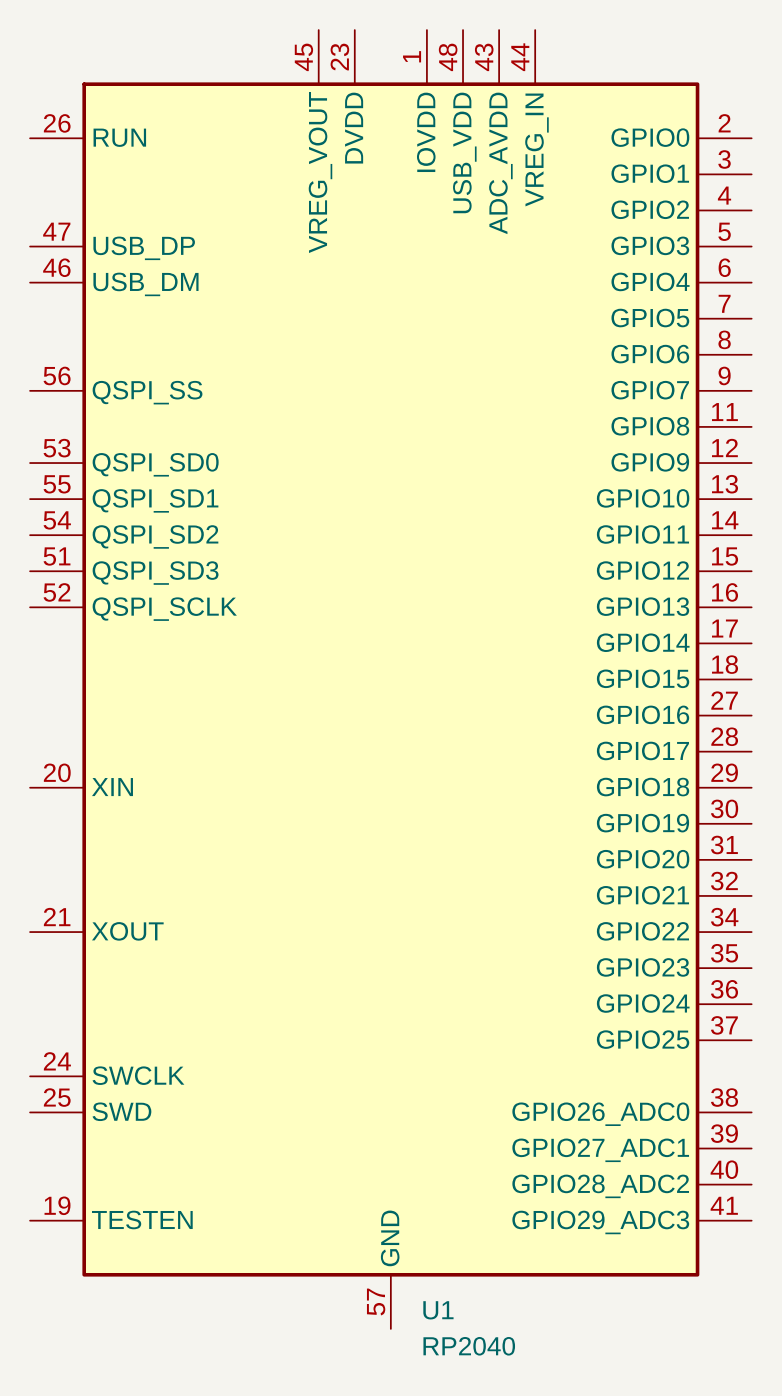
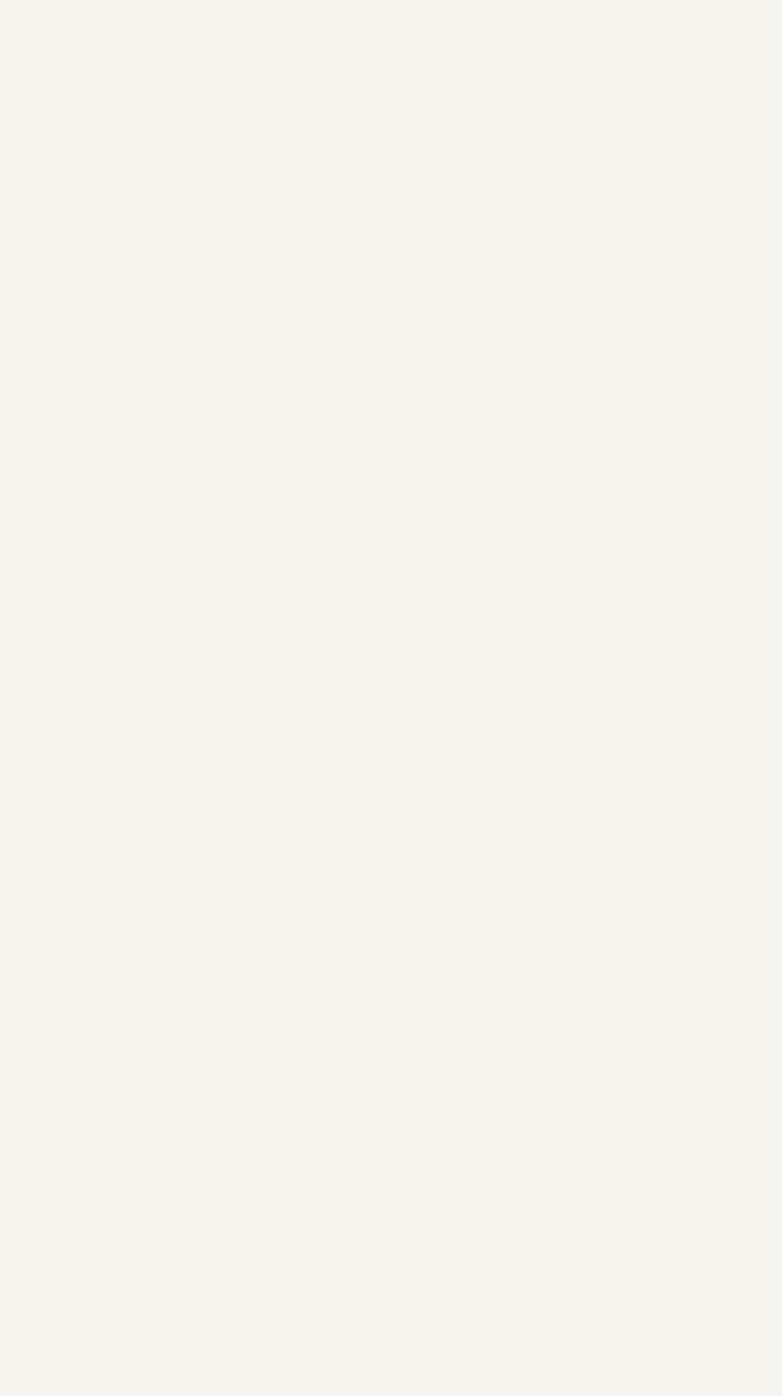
U1: RP2040 (390, 679) -> none

